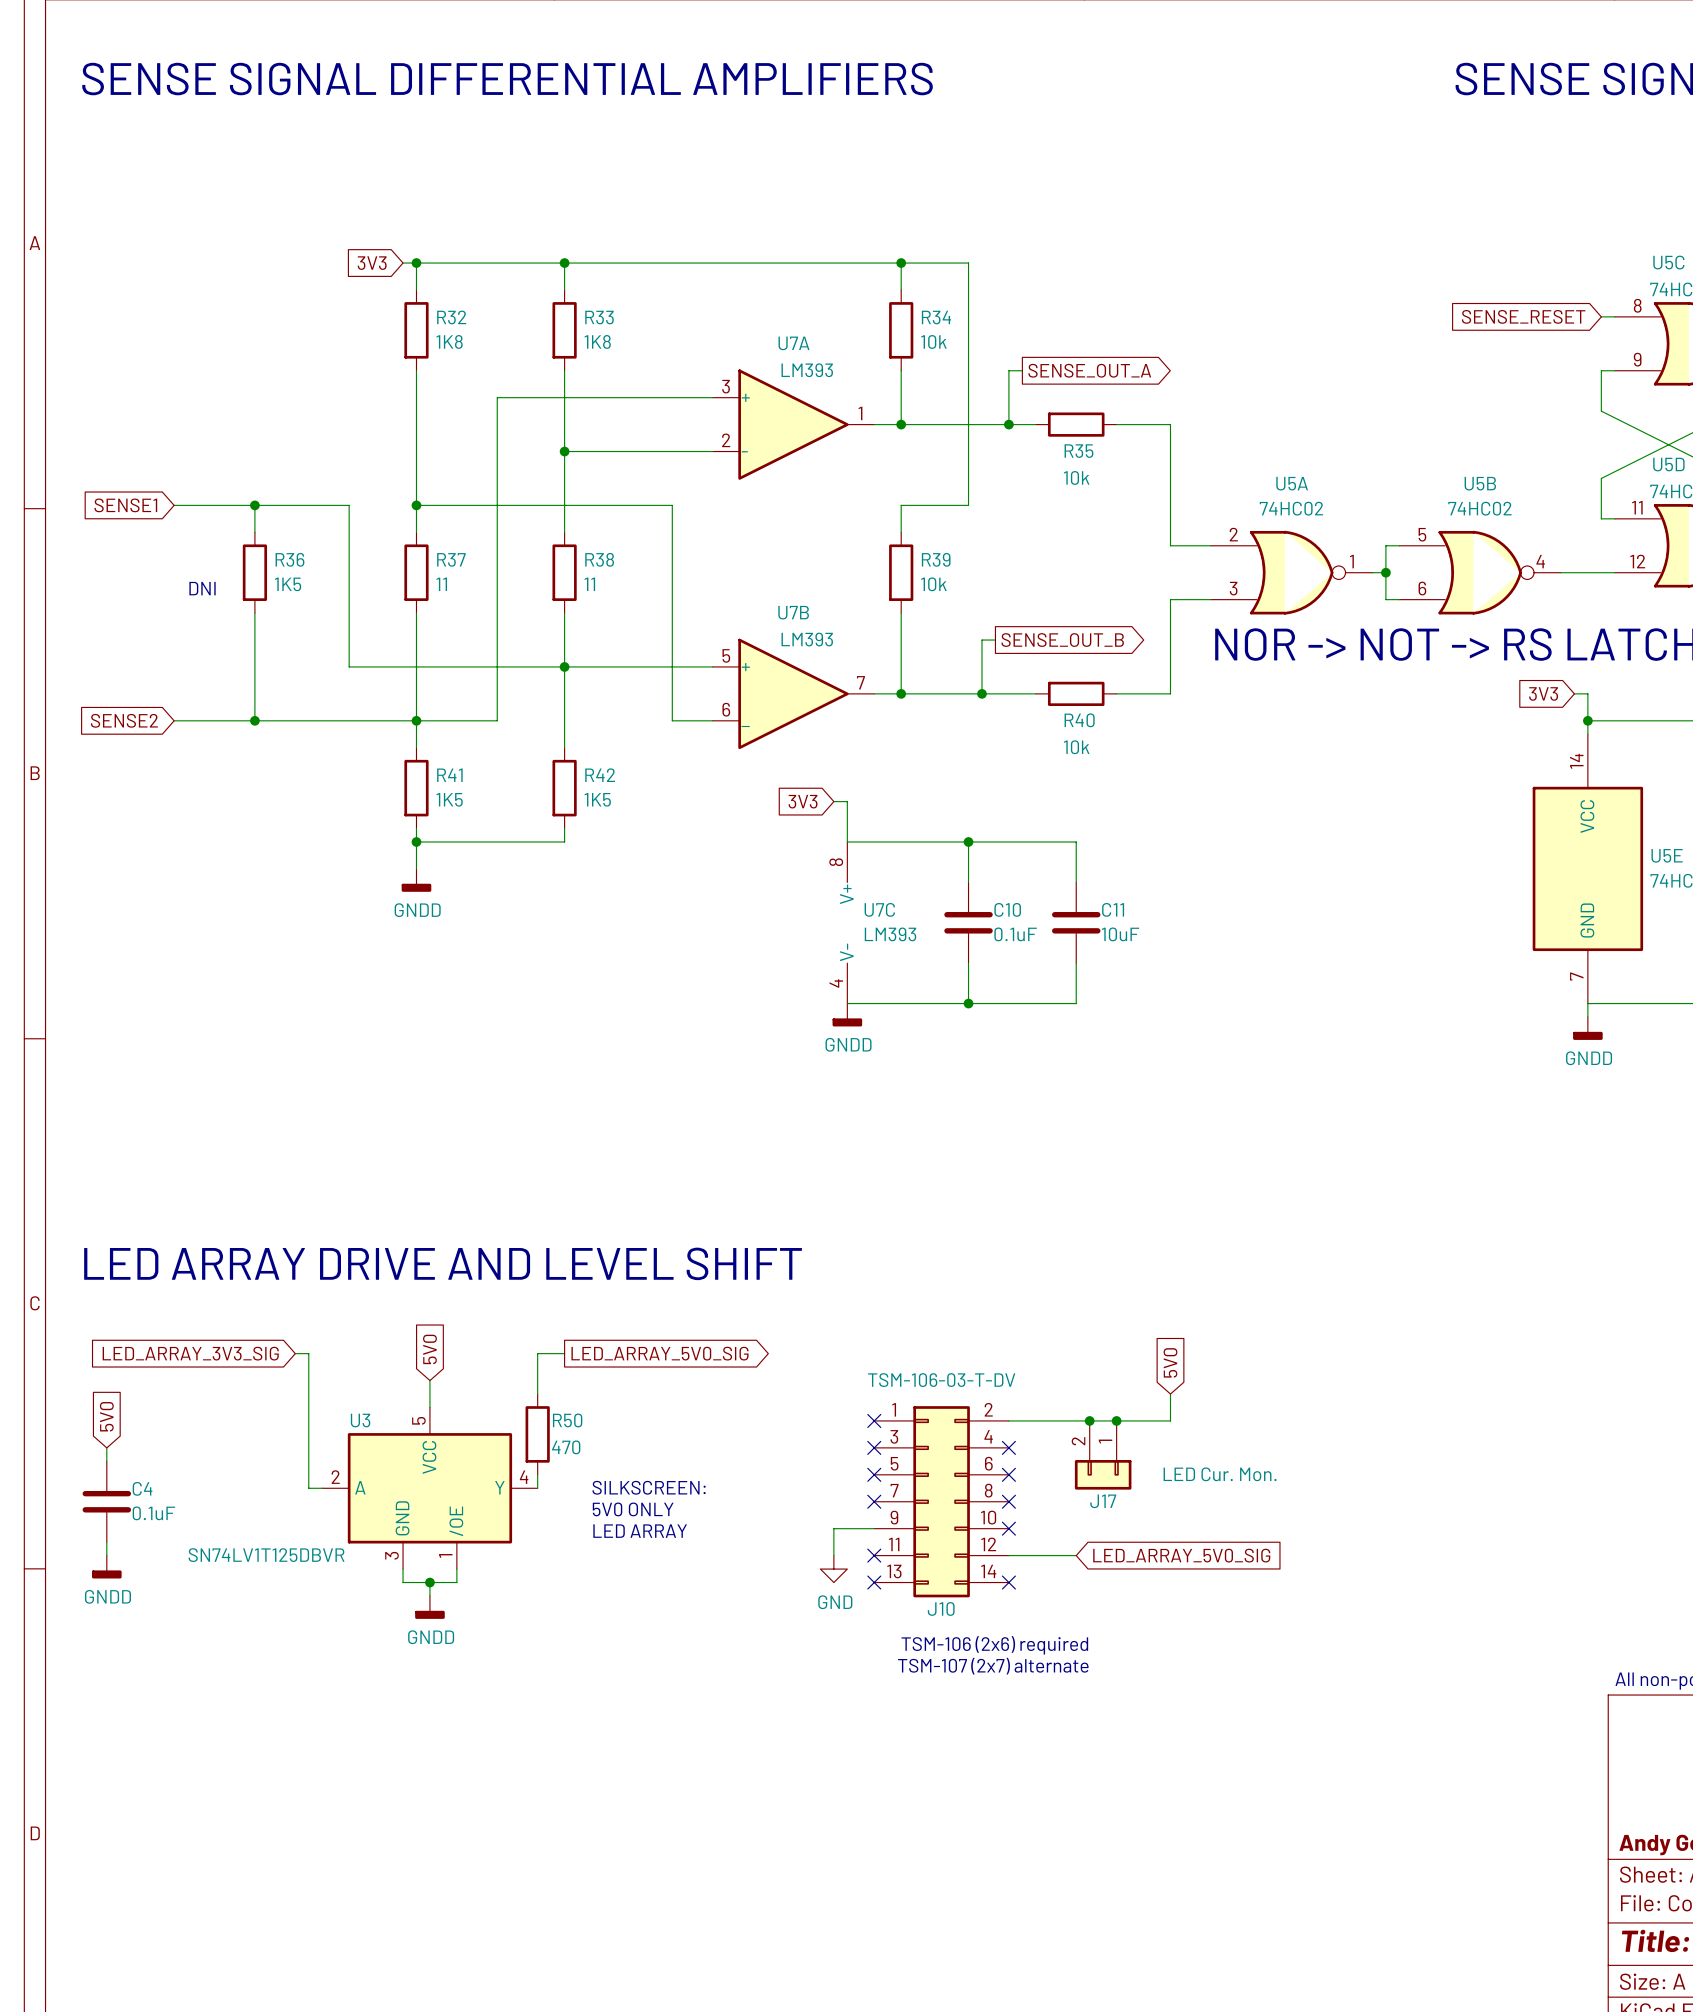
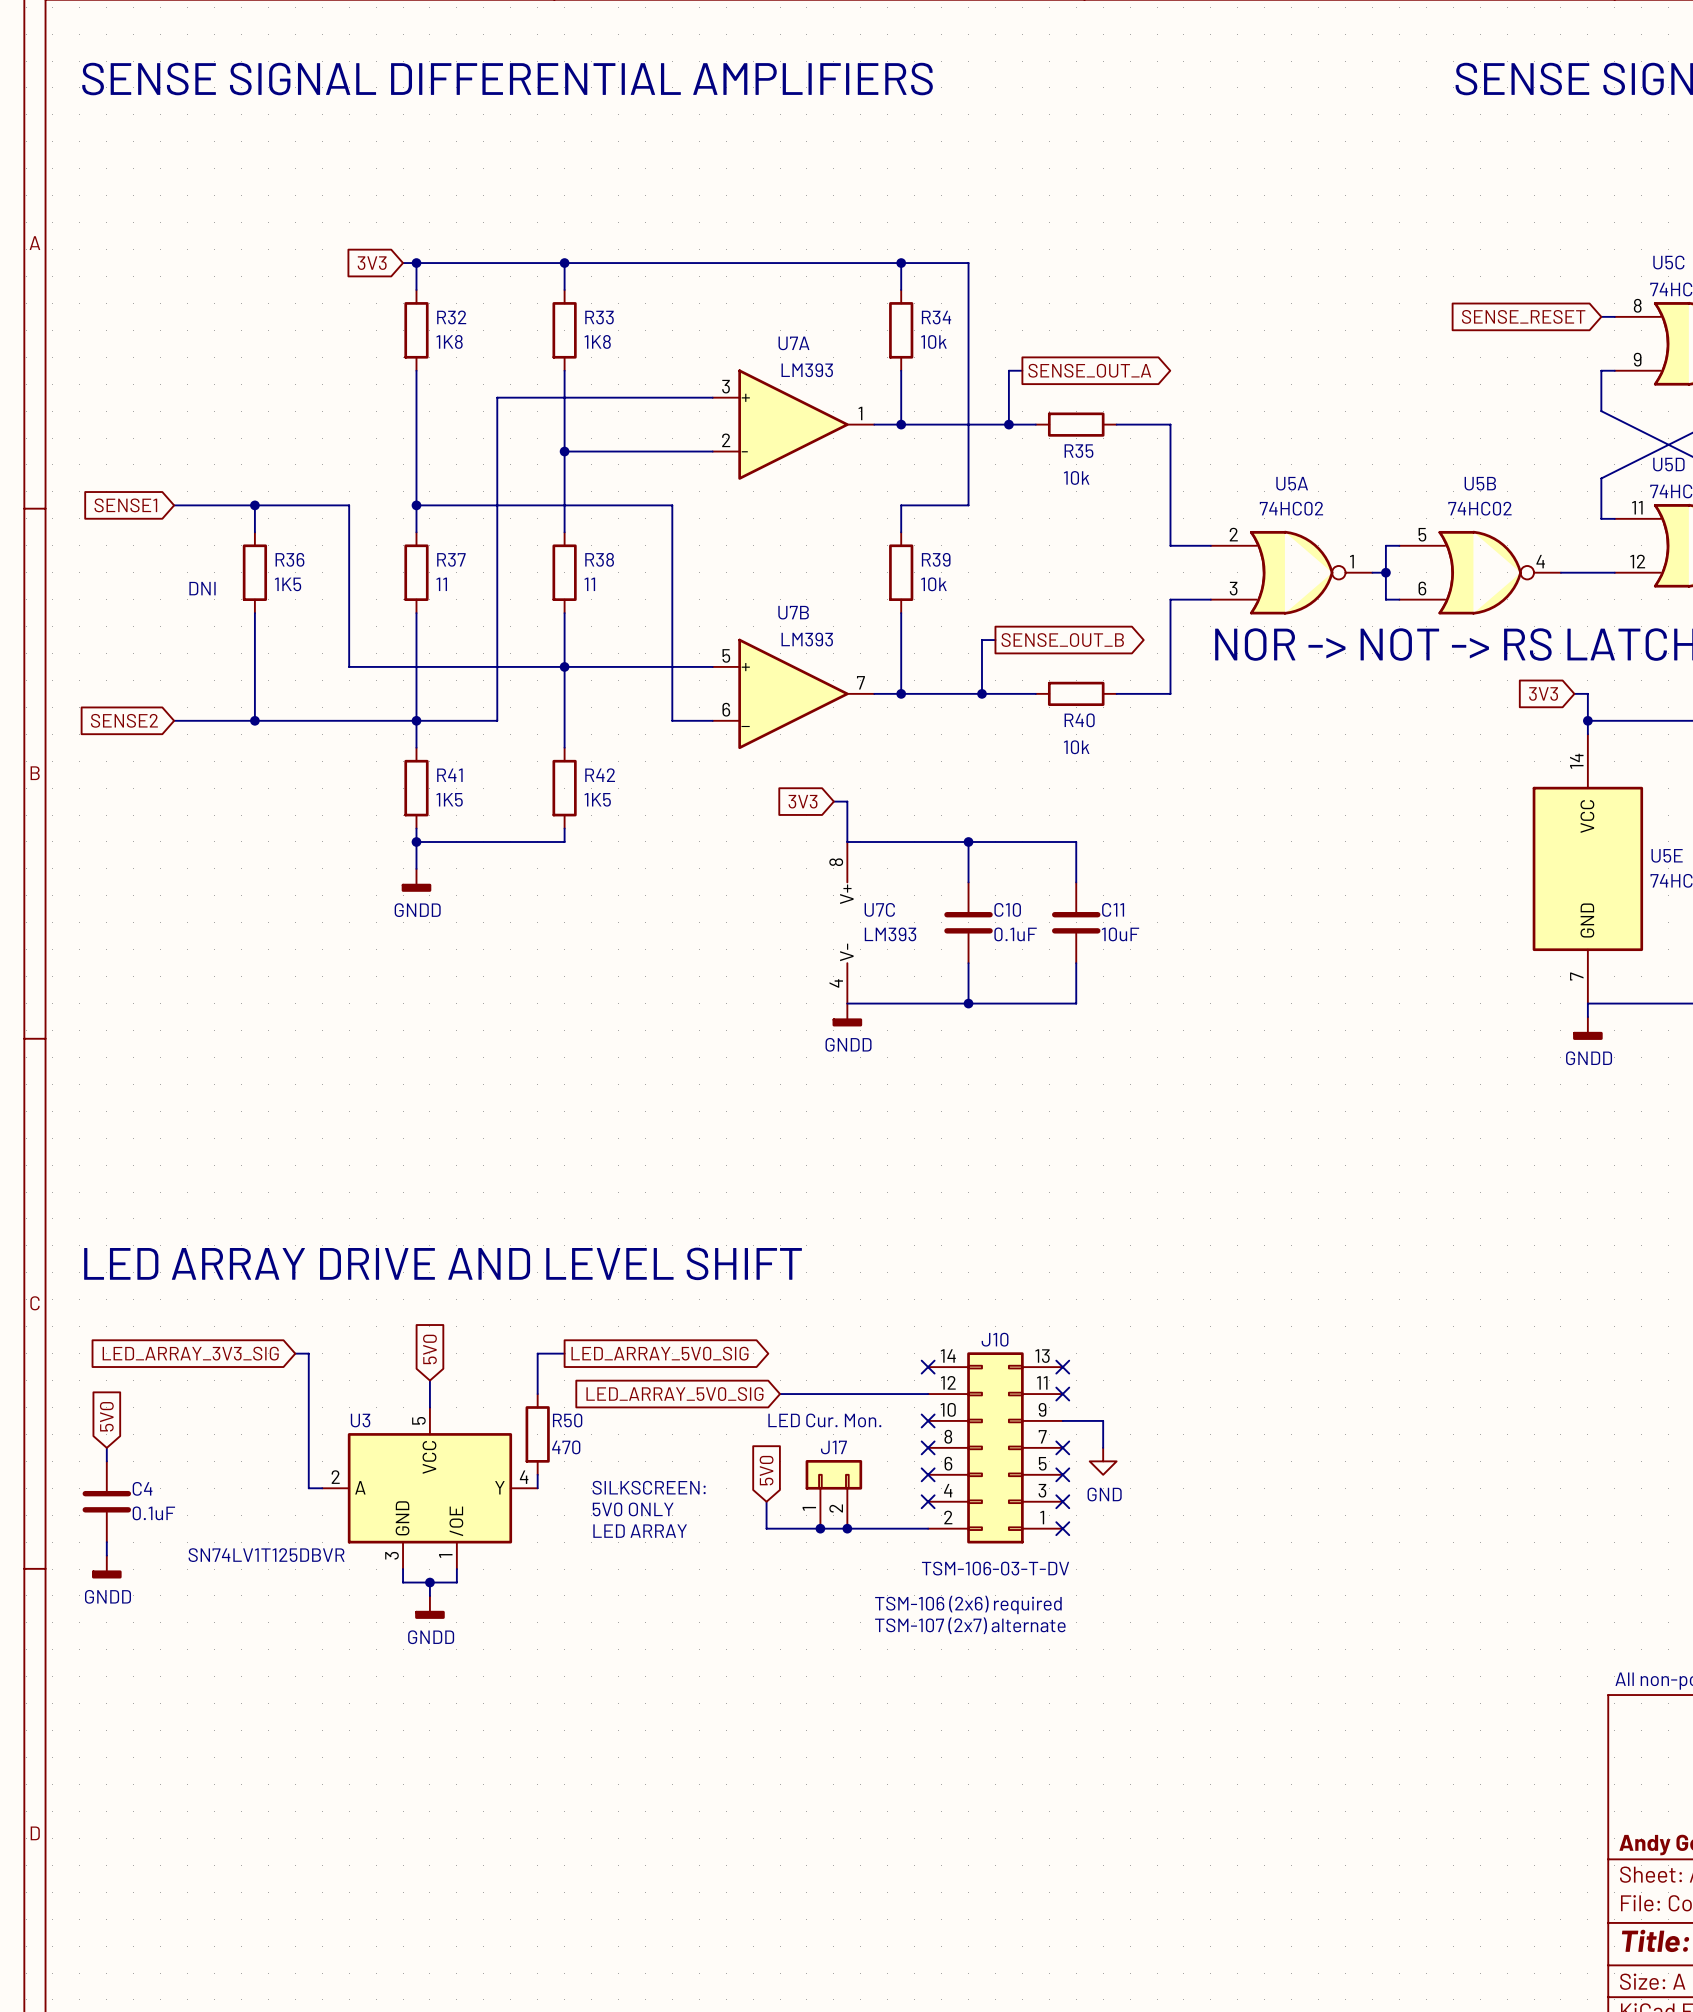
global label: 5V0 (1170, 1362) -> none
no-connect mark: none -> (928, 1367)
no-connect mark: none -> (1062, 1367)
global label: none -> LED_ARRAY_5V0_SIG (674, 1394)
wire: none -> (780, 1394) (928, 1394)
no-connect mark: none -> (1062, 1394)
wire: (1170, 1394) (1170, 1420) (1103, 1420) -> (1103, 1447) (1103, 1420)
no-connect mark: (874, 1420) -> none
no-connect mark: none -> (928, 1420)
junction: (1089, 1420) -> none
junction: (1116, 1420) -> none
no-connect mark: (874, 1447) -> none
no-connect mark: none -> (928, 1447)
no-connect mark: (1008, 1447) -> none
no-connect mark: none -> (1062, 1447)
J17 position: (1103, 1455) -> (833, 1494)
power symbol: none -> GND (1103, 1461)
global label: none -> 5V0 (766, 1470)
no-connect mark: (874, 1474) -> none
no-connect mark: none -> (928, 1474)
no-connect mark: (1008, 1474) -> none
no-connect mark: none -> (1062, 1474)
J17 rotation: 0° (1103, 1474) -> 180° (833, 1474)
J17 value position: LED Cur. Mon. (1220, 1474) -> LED Cur. Mon. (824, 1420)
no-connect mark: (874, 1501) -> none
no-connect mark: none -> (928, 1501)
J10 rotation: 0° (941, 1501) -> 180° (995, 1447)
no-connect mark: (1008, 1501) -> none
no-connect mark: none -> (1062, 1501)
junction: none -> (820, 1528)
wire: (833, 1528) (833, 1555) -> (833, 1528) (766, 1528) (766, 1501)
junction: none -> (847, 1528)
no-connect mark: (1008, 1528) -> none
no-connect mark: none -> (1062, 1528)
no-connect mark: (874, 1555) -> none
wire: (1008, 1555) (1076, 1555) -> none
global label: LED_ARRAY_5V0_SIG (1181, 1555) -> none
power symbol: GND (833, 1569) -> none
no-connect mark: (874, 1582) -> none
no-connect mark: (1008, 1582) -> none
text position: TSM-106 (2x6) required (994, 1645) -> TSM-106 (2x6) required (968, 1604)
text position: TSM-107 (2x7) alternate (993, 1666) -> TSM-107 (2x7) alternate (970, 1625)

